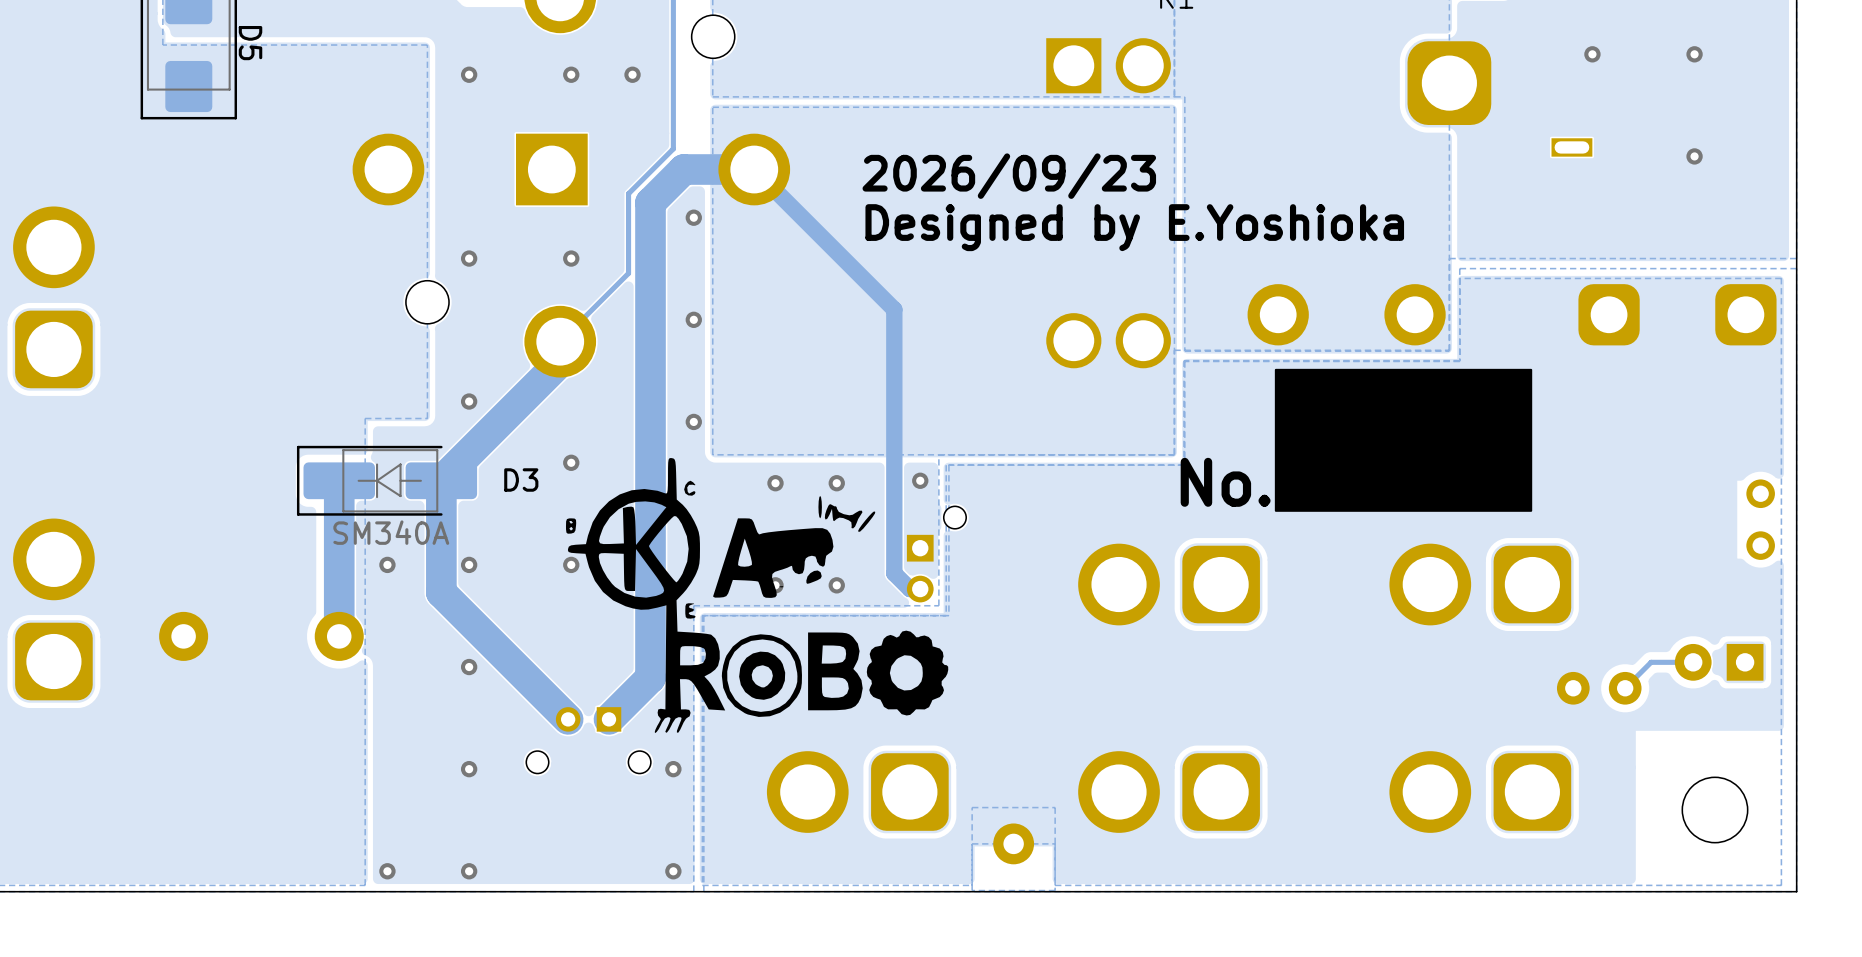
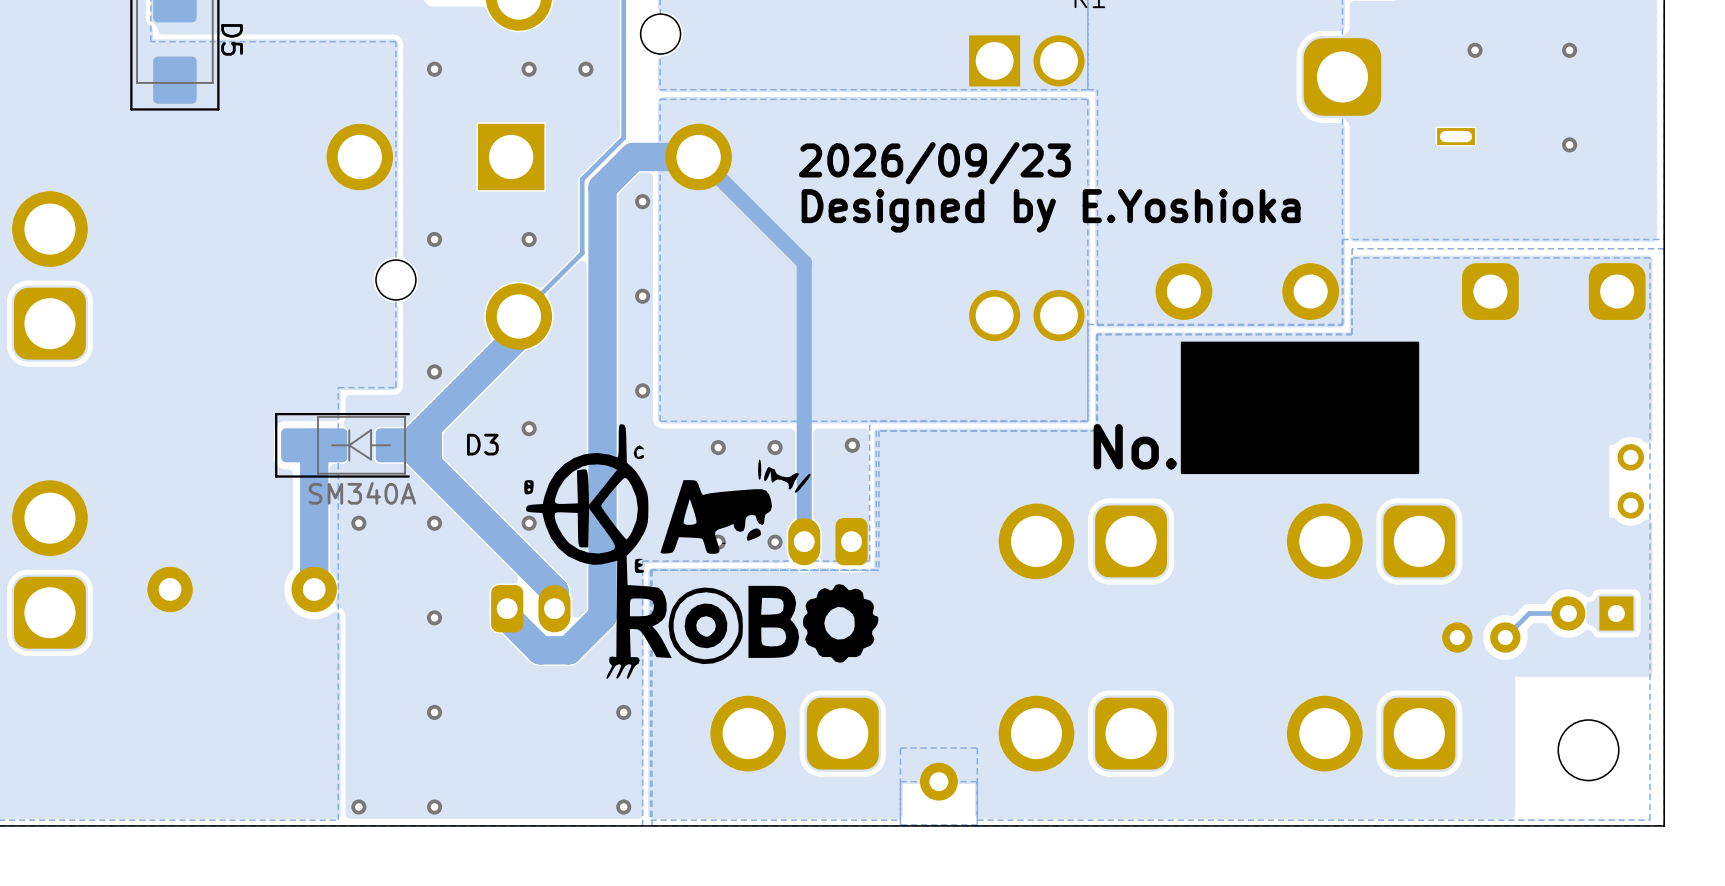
track: (868, 283) (894, 309) (894, 573) (909, 589) (920, 589) -> (804, 262) (804, 541)
track: (441, 480) (441, 592) (568, 719) -> (408, 445) (554, 590) (554, 608)
part: (936, 554) -> none
part: none -> (827, 541)
part: none -> (530, 608)
track: (650, 665) (650, 677) (609, 719) -> (602, 616) (568, 650) (540, 650) (507, 617) (507, 608)
part: (588, 740) -> none

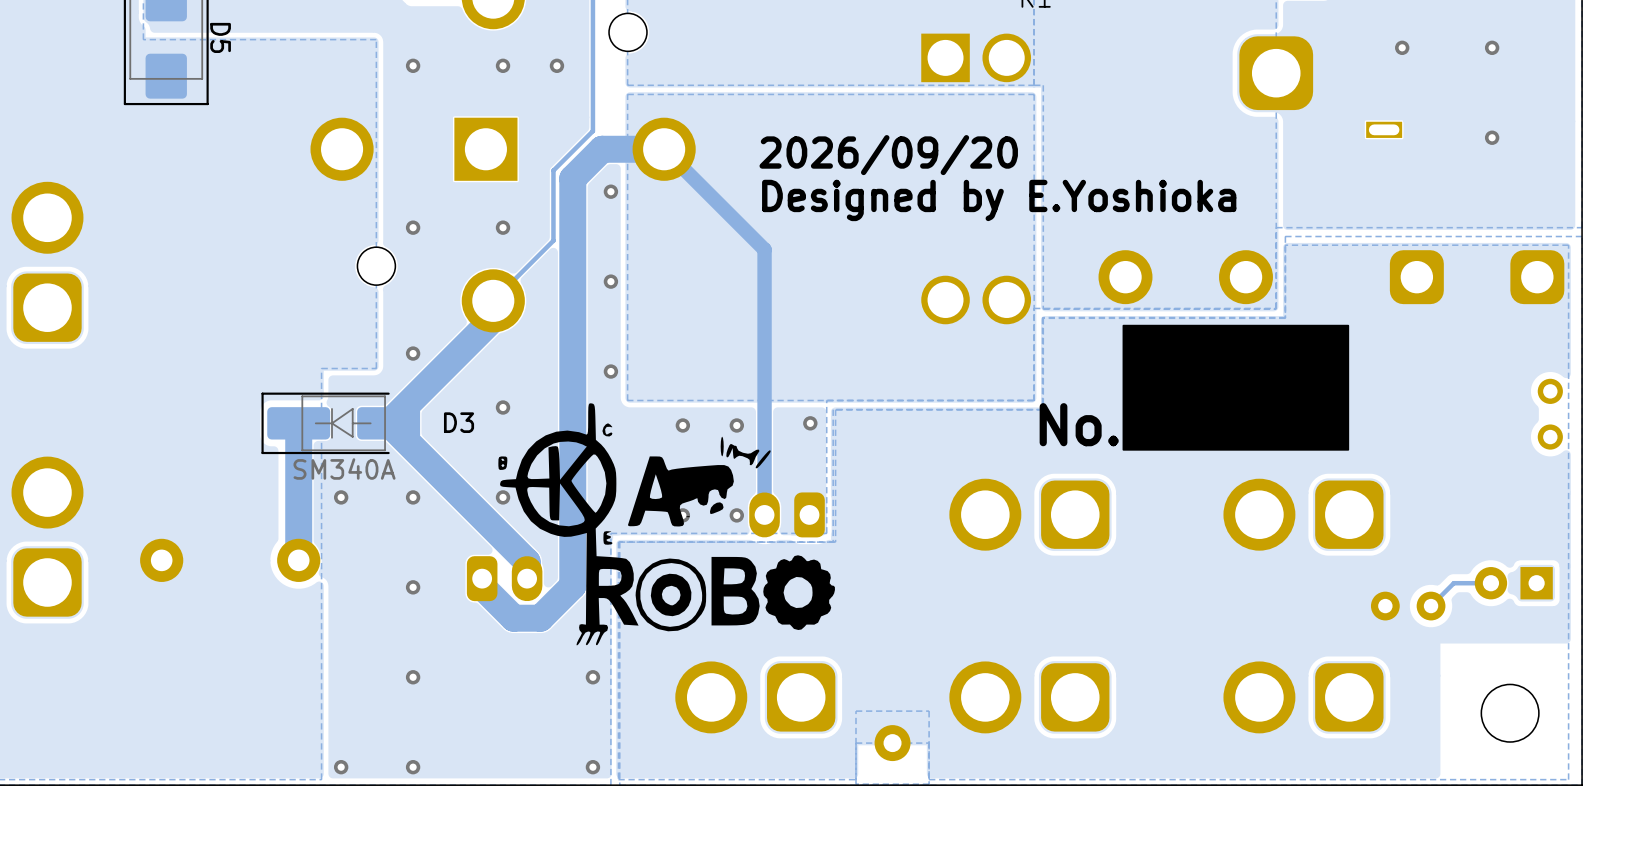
text: 2026/09/23 (934, 163) -> 2026/09/20 (888, 155)
part position: (1630, 481) -> (1550, 414)

